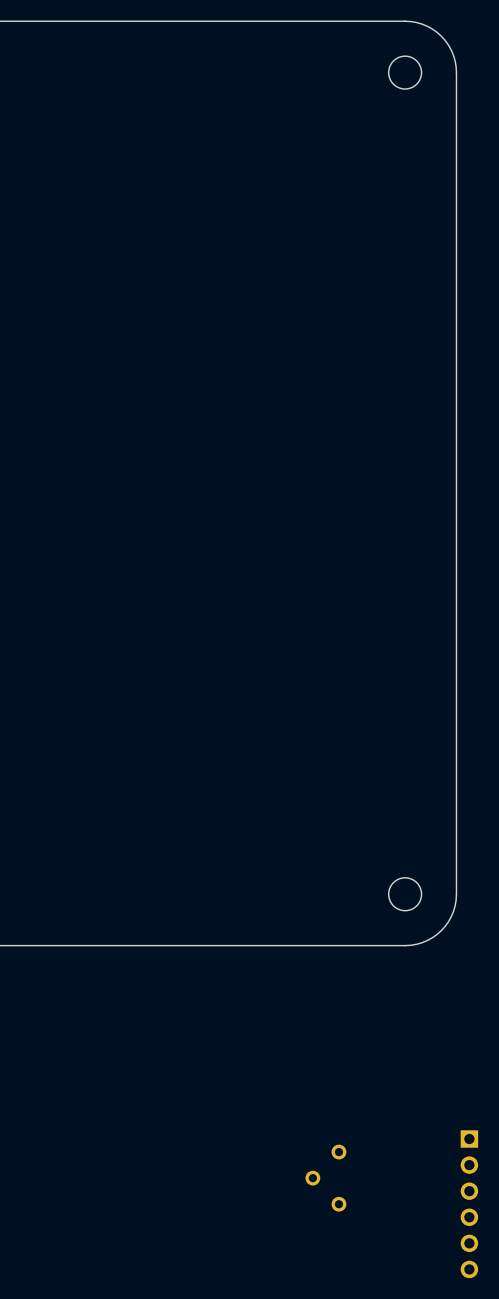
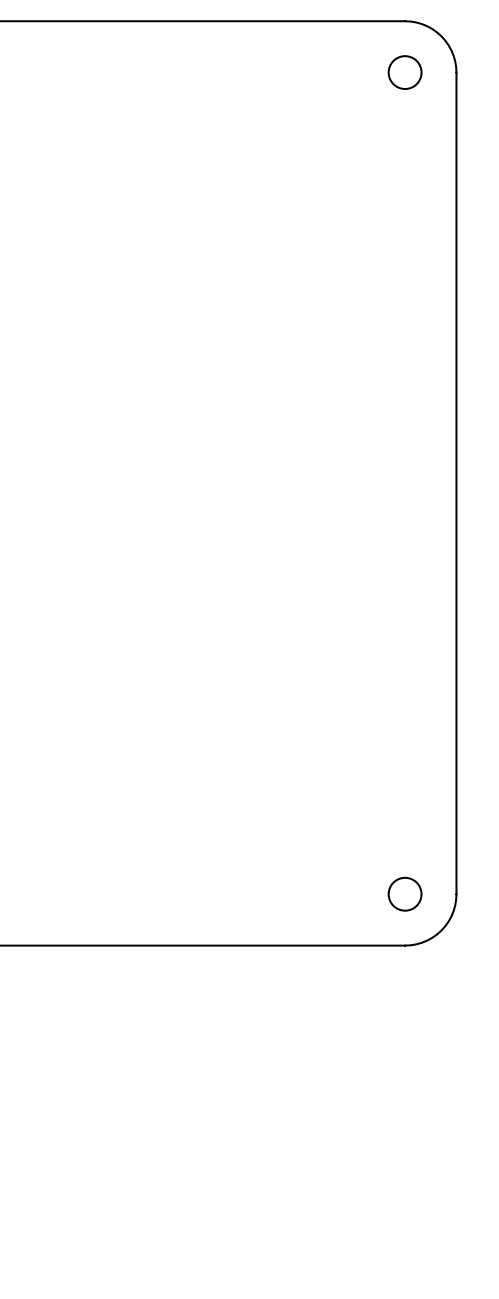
part: (325, 1178) -> none
part: (469, 1204) -> none

